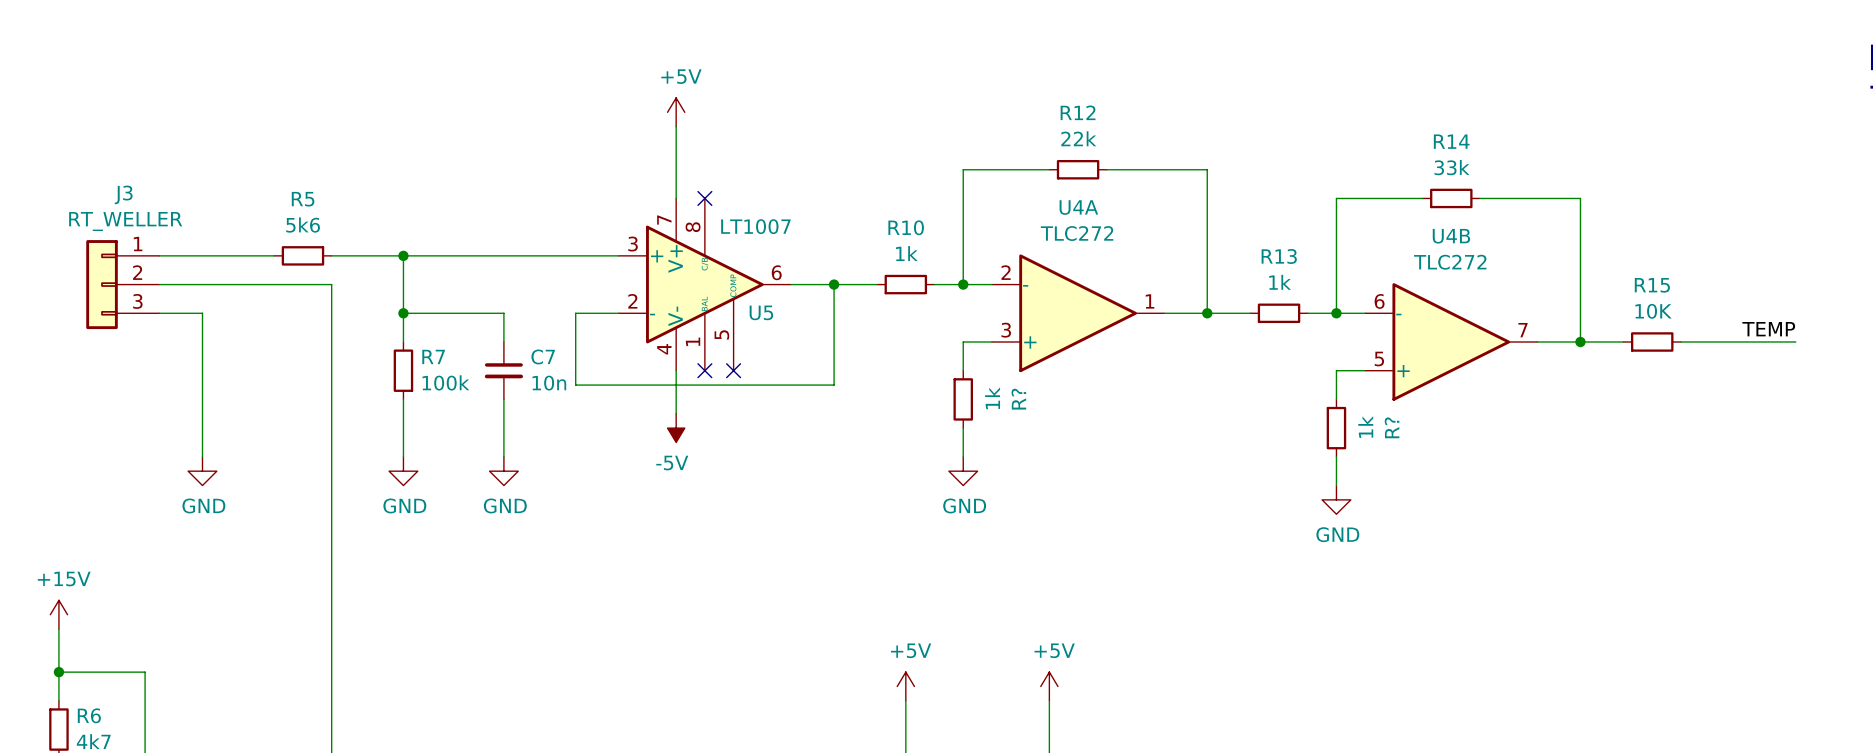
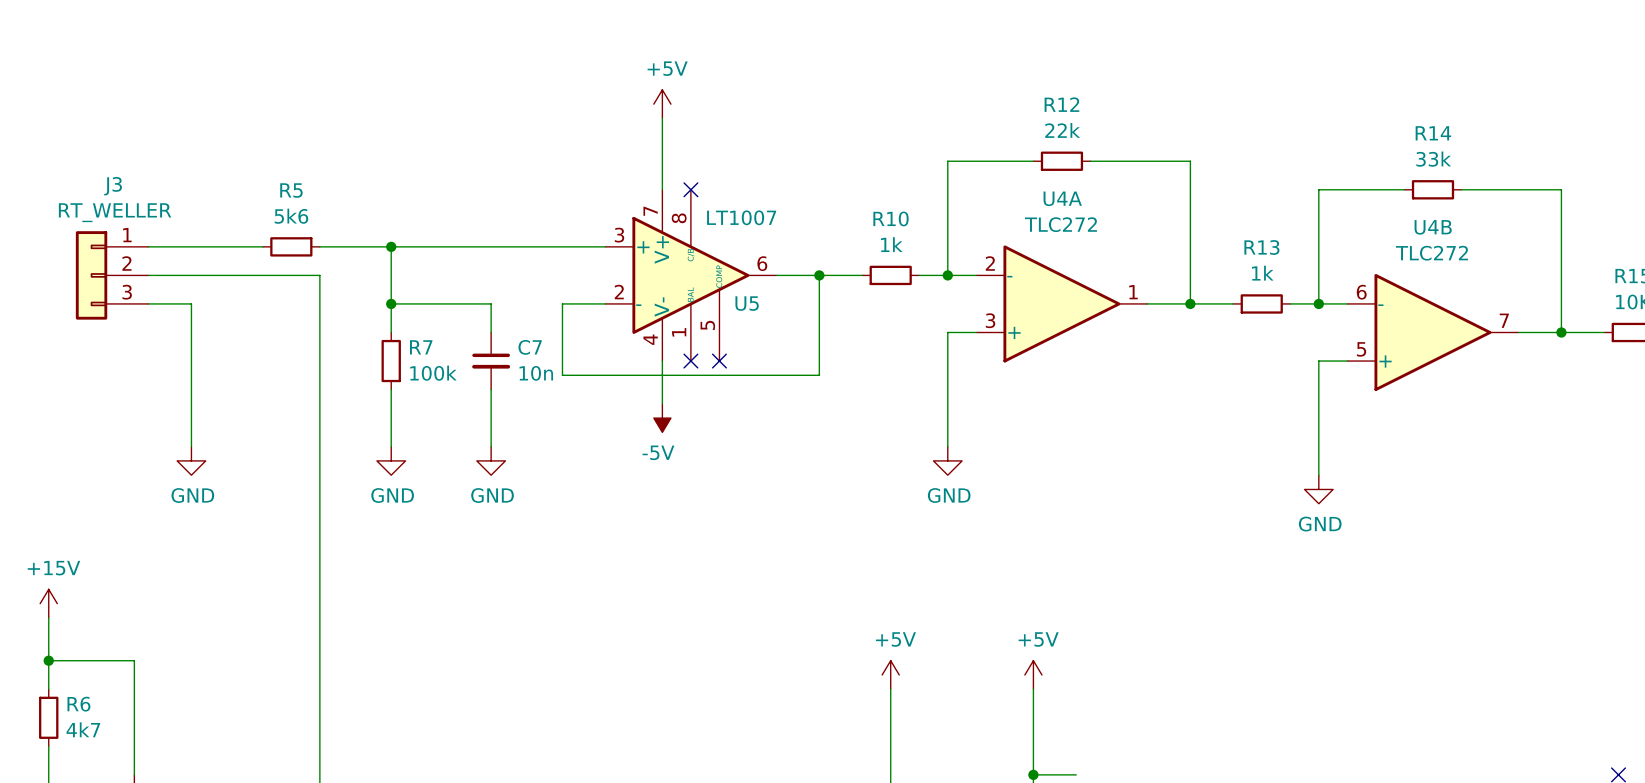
wire: none -> (947, 361) (947, 418)
R?: 1k (963, 399) -> none
wire: none -> (1318, 389) (1318, 446)
R?: 1k (1336, 428) -> none

